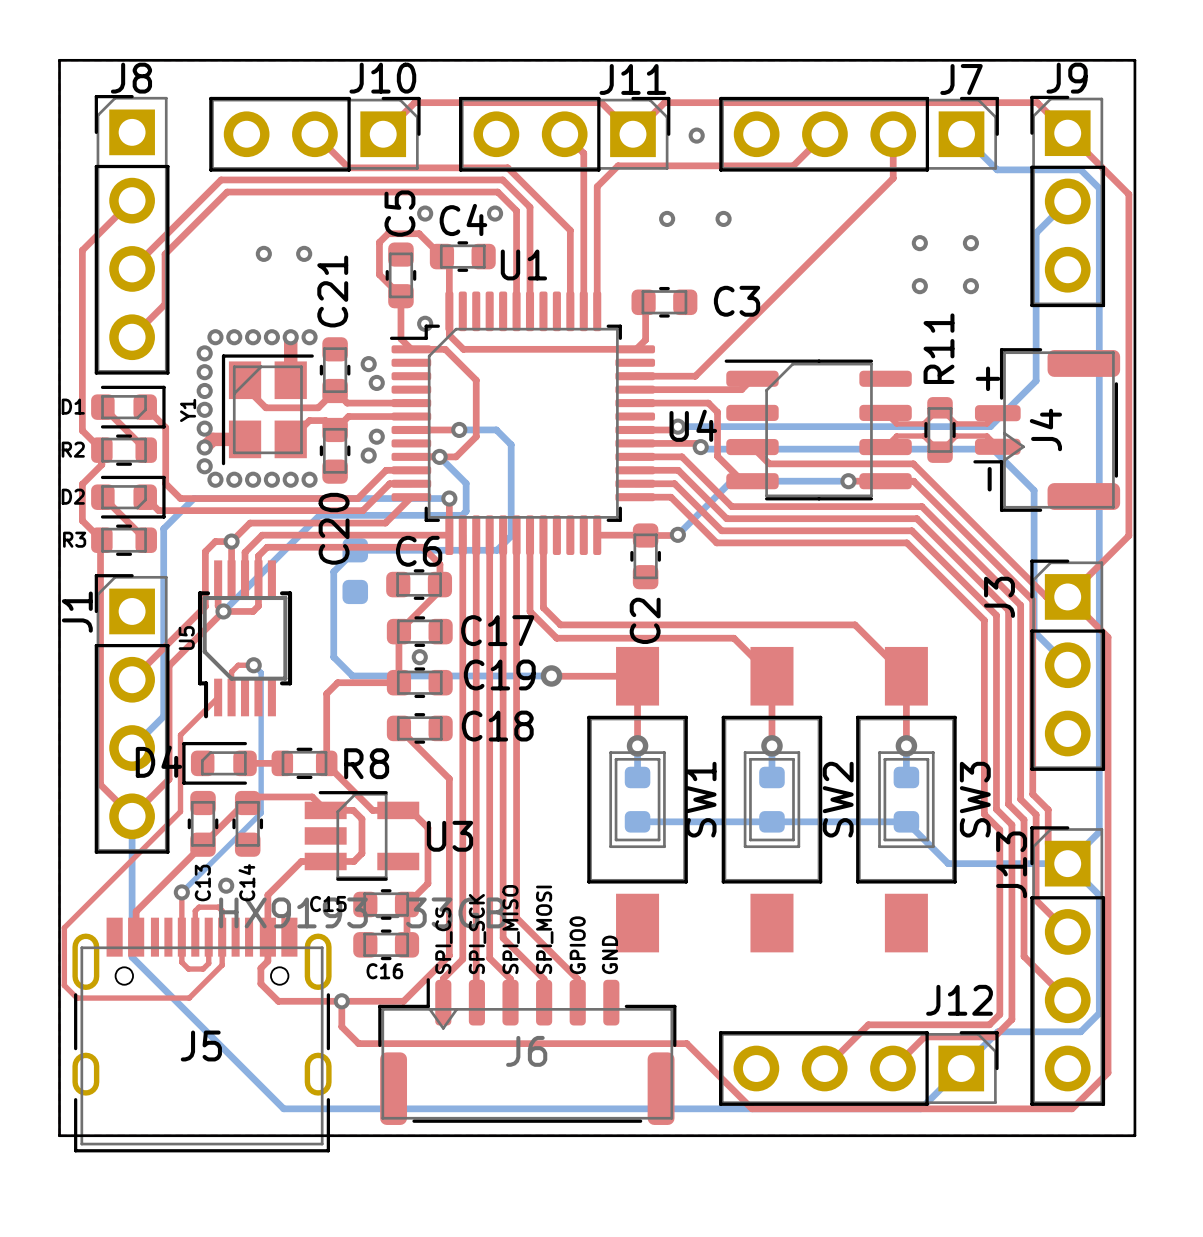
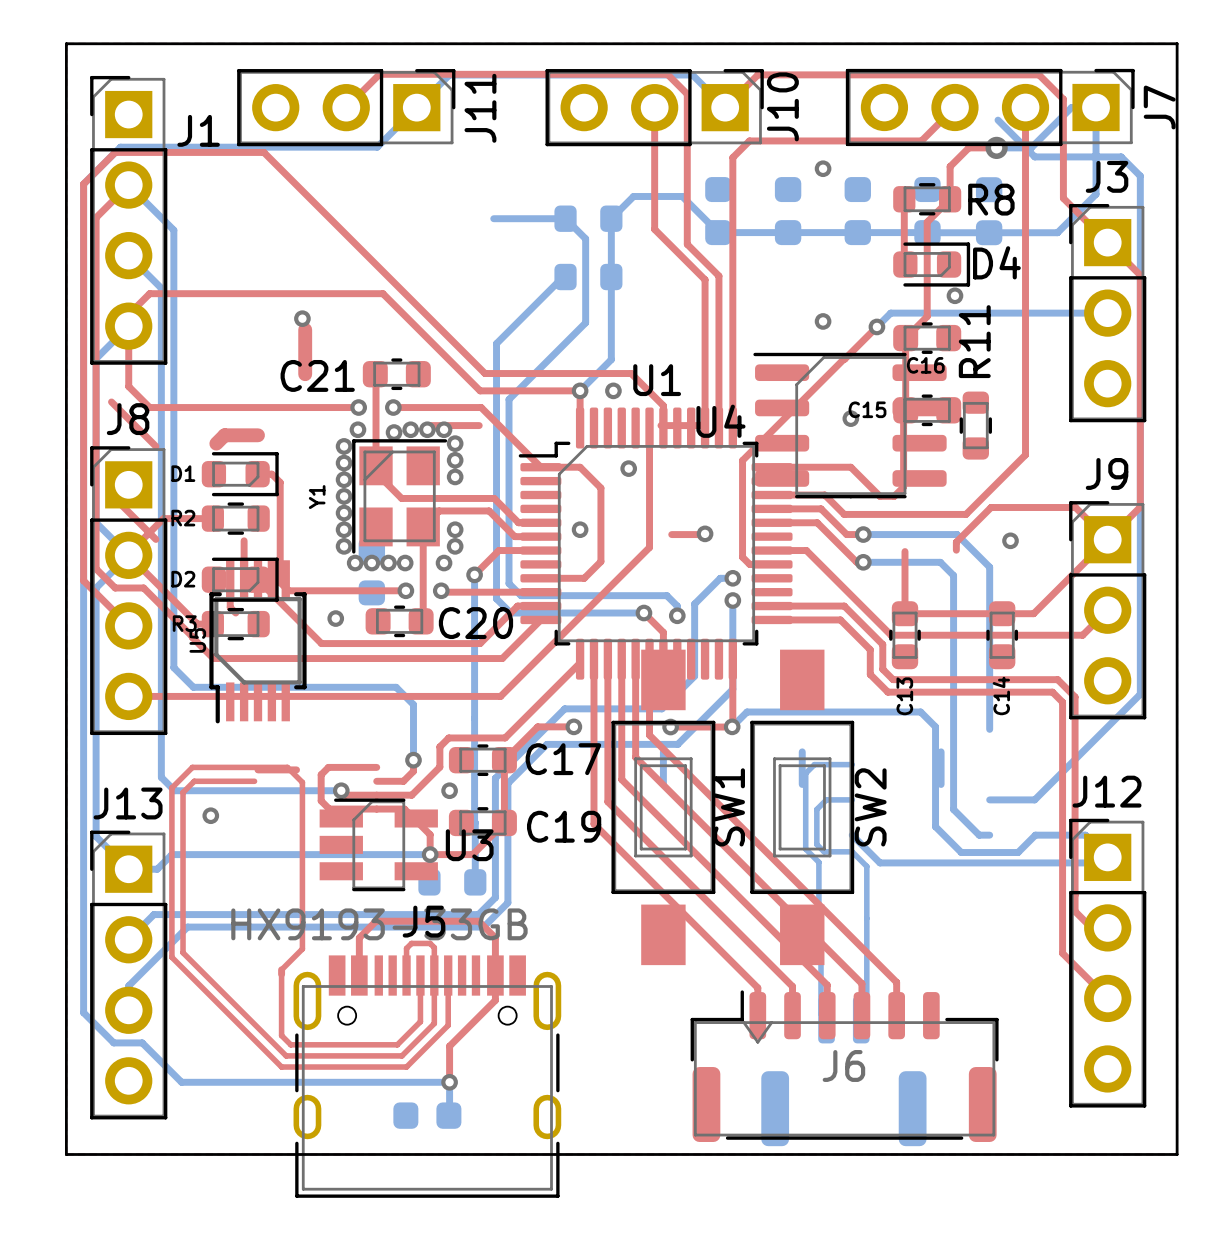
J8 name position: J8 (131, 78) -> J8 (128, 419)
J10 name rotation: 0° (382, 78) -> 90° counterclockwise (782, 106)
J9 name position: J9 (1067, 78) -> J9 (1107, 473)
J11 name rotation: 0° (632, 79) -> 90° counterclockwise (480, 108)
J7 name rotation: 0° (961, 79) -> 90° counterclockwise (1159, 107)
J7 name position: J7 (961, 79) -> J7 (1159, 107)
top track: none -> (346, 107) (379, 74) (667, 74) (687, 94) (687, 244) (718, 276) (718, 428)
top track: none -> (654, 107) (654, 229) (705, 279) (705, 428)
top track: none -> (725, 107) (757, 74) (1039, 74) (1063, 99) (1063, 198) (1140, 275) (1140, 507) (1033, 613) (904, 613) (904, 551)
bottom track: none -> (725, 107) (692, 75) (449, 75) (377, 147) (120, 147) (83, 184) (83, 1012) (113, 1042) (142, 1042) (181, 1082) (449, 1082) (448, 1115)
top track: none -> (954, 107) (921, 140) (749, 140) (732, 157) (732, 428)
top track: none -> (1025, 107) (1025, 454) (965, 514) (844, 514) (824, 495) (772, 495)
top track: (314, 134) (348, 167) (507, 167) (570, 230) (570, 311) -> none
J10 position: (314, 134) -> (654, 107)
top track: (383, 134) (414, 102) (601, 102) (632, 134) (664, 102) (1037, 102) (1128, 194) (1128, 535) (1067, 596) -> none
top track: (564, 134) (583, 153) (583, 311) -> none
J11 position: (564, 134) -> (346, 107)
top track: (824, 134) (793, 165) (618, 165) (597, 186) (597, 311) -> none
J7 position: (859, 134) -> (990, 107)
top track: (893, 134) (893, 178) (695, 376) (635, 376) -> none
via: (696, 135) -> none
top track: none -> (996, 147) (968, 147) (950, 166) (950, 199) (927, 222) (927, 316) (905, 338) (903, 487) (894, 496) (880, 496) (850, 467) (772, 467)
bottom track: none -> (996, 147) (1031, 147) (1071, 107) (1096, 107) (1096, 194) (1057, 232) (927, 232)
via: none -> (996, 147)
via: none -> (823, 168)
top track: none -> (128, 185) (96, 217) (96, 568) (115, 587) (143, 587) (213, 658) (502, 658) (540, 619)
bottom track: none -> (128, 185) (173, 230) (173, 667) (193, 687) (396, 687) (413, 704) (413, 760)
top track: (132, 200) (82, 250) (82, 430) (101, 450) (101, 464) (82, 484) (82, 520) (101, 540) (100, 784) (132, 816) (169, 779) (169, 665) (223, 611) (253, 611) (258, 606) (258, 555) (267, 547) (422, 547) (439, 564) (439, 590) (398, 631) (398, 682) (337, 682) (326, 693) (326, 764) (372, 810) (410, 810) (427, 827) (427, 883) (407, 904) (407, 944) -> none
bottom track: (1067, 201) (1036, 233) (1036, 380) (990, 426) (677, 426) -> none
J9 position: (1067, 201) -> (1107, 610)
top track: none -> (904, 199) (905, 264)
via: (425, 213) -> none
via: (495, 213) -> none
via: (667, 218) -> none
via: (723, 218) -> none
bottom track: none -> (493, 218) (565, 218) (585, 238) (585, 322) (509, 399) (509, 583) (521, 595) (666, 595) (677, 606) (677, 615)
part: none -> (588, 218)
J8 position: (132, 234) -> (128, 590)
bottom track: none -> (927, 232) (718, 232) (682, 196) (633, 196) (611, 218) (611, 359) (580, 390)
via: (919, 243) -> none
via: (970, 243) -> none
via: (263, 253) -> none
via: (304, 253) -> none
C4 side: top (462, 256) -> bottom (857, 211)
bottom track: none -> (128, 255) (161, 288) (161, 777) (174, 790) (341, 790)
top track: (132, 268) (221, 179) (502, 179) (530, 207) (530, 311) -> none
C5 side: top (400, 275) -> bottom (927, 211)
bottom track: none -> (565, 277) (563, 277) (496, 343) (496, 598) (510, 613) (643, 613)
part: none -> (588, 277)
via position: (919, 286) -> (954, 295)
via: (970, 286) -> none
C21 name position: C21 (332, 291) -> C21 (317, 375)
top track: (643, 302) (645, 304) (645, 339) (636, 349) (463, 349) (449, 335) (449, 263) (419, 233) (388, 233) (379, 242) (379, 274) (400, 296) (400, 338) (411, 349) (445, 349) (476, 380) (476, 436) (456, 456) (411, 456) -> none
C3 side: top (664, 302) -> bottom (788, 211)
top track: (516, 311) (516, 210) (497, 192) (227, 192) (165, 254) (165, 304) (132, 337) -> none
bottom track: none -> (1107, 313) (890, 313) (876, 326)
via: (425, 323) -> none
via: none -> (302, 318)
via: none -> (823, 321)
bottom track: none -> (128, 326) (96, 358) (96, 522) (128, 555) (96, 587) (96, 836) (128, 869) (157, 869) (171, 854) (430, 854) (429, 882)
top track: none -> (876, 326) (742, 460) (742, 557) (749, 564) (772, 564)
via: none -> (876, 326)
via: (215, 337) -> none
via: (234, 337) -> none
via: (253, 337) -> none
via: (271, 337) -> none
via: (290, 337) -> none
via: (309, 337) -> none
via: (204, 353) -> none
via: (368, 364) -> none
C21 rotation: 0° (335, 370) -> 90° clockwise (396, 374)
C21 position: (335, 370) -> (396, 374)
via: (204, 372) -> none
top track: (752, 378) (741, 389) (635, 389) -> none
text: + (988, 378) -> none
top track: (245, 380) (245, 386) (265, 407) (318, 407) (335, 391) (347, 403) (411, 403) -> none
top track: none -> (375, 374) (376, 472) (401, 498) (494, 498) (518, 522) (540, 522)
via: (376, 382) -> none
via: (204, 391) -> none
via: none -> (580, 390)
via: none -> (613, 390)
top track: (635, 403) (708, 403) (717, 412) (717, 456) (742, 481) (752, 481) -> none
D1 position: (128, 407) -> (240, 474)
top track: (145, 407) (165, 427) (165, 483) (180, 498) (357, 498) (386, 470) (411, 470) -> none
via: (204, 409) -> none
Y1 position: (267, 409) -> (399, 496)
top track: none -> (358, 407) (149, 407) (128, 386) (128, 314) (149, 293) (382, 293) (480, 390) (580, 390) (580, 428)
via: none -> (358, 407)
top track: none -> (393, 407) (481, 407) (540, 467) (580, 467) (600, 488) (600, 561) (584, 578) (540, 578)
via: none -> (393, 407)
top track: (885, 412) (896, 423) (923, 423) (940, 407) (956, 423) (987, 423) (997, 413) -> none
top track: (411, 416) (348, 416) (335, 429) (325, 420) (309, 420) (290, 439) -> none
U1 position: (522, 423) -> (655, 543)
via: none -> (850, 418)
via: (677, 426) -> none
via: (204, 428) -> none
bottom track: (459, 429) (496, 429) (511, 444) (511, 536) (497, 550) (355, 550) (333, 571) (333, 657) (352, 675) (551, 675) -> none
via: (459, 429) -> none
J4 side: top (1046, 429) -> bottom (843, 1071)
top track: none -> (649, 428) (649, 547) (500, 696) (128, 696)
top track: none -> (663, 428) (663, 405) (631, 373) (485, 373) (263, 152) (115, 152) (83, 184) (83, 580) (128, 625)
via: none -> (357, 429)
via: none -> (410, 429)
via: none -> (427, 429)
via: none -> (444, 429)
top track: (635, 443) (697, 443) (700, 447) -> none
top track: (997, 446) (987, 436) (956, 436) (940, 452) (923, 436) (896, 436) (885, 447) -> none
via: (204, 447) -> none
via: none -> (455, 443)
bottom track: (700, 447) (702, 449) (992, 449) (1034, 490) (1034, 631) (1067, 665) -> none
via: (700, 447) -> none
top track: (752, 447) (769, 463) (913, 463) (1046, 596) (1067, 596) -> none
R2 position: (124, 450) -> (235, 518)
via: none -> (344, 446)
C20 rotation: 0° (335, 450) -> 90° clockwise (399, 621)
C20 position: (335, 450) -> (399, 621)
via: (368, 455) -> none
bottom track: (439, 456) (466, 483) (466, 511) (462, 515) (319, 515) (223, 611) -> none
via: (439, 456) -> none
top track: (635, 456) (681, 456) (731, 506) (921, 506) (1020, 605) (1020, 799) (1036, 814) -> (772, 606) (844, 606) (882, 644) (882, 669) (893, 679) (1057, 679) (1075, 697) (1075, 823)
via: none -> (455, 460)
via: (204, 466) -> none
via: none -> (344, 463)
top track: (635, 470) (678, 470) (726, 518) (916, 518) (1008, 610) (1008, 804) (1024, 819) -> (772, 619) (840, 619) (870, 649) (870, 674) (887, 692) (1052, 692) (1062, 702) (1062, 828)
via: none -> (628, 468)
top track: none -> (257, 474) (271, 474) (280, 482) (280, 582) (288, 590) (405, 590)
via: (215, 479) -> none
via: (234, 479) -> none
via: (253, 479) -> none
via: (271, 479) -> none
via: (290, 479) -> none
via: (309, 479) -> none
via: none -> (455, 476)
text: - (989, 479) -> none
top track: (848, 481) (913, 481) (1032, 600) (1032, 794) (1048, 809) (1048, 844) (1067, 863) -> none
bottom track: (848, 481) (731, 481) (677, 534) -> none
via: (848, 481) -> none
via: none -> (344, 479)
top track: (411, 483) (389, 483) (362, 510) (158, 510) (145, 497) -> none
top track: (635, 483) (674, 483) (721, 530) (911, 530) (996, 615) (996, 809) (1011, 824) (1011, 1019) (994, 1036) (924, 1036) (892, 1068) -> none
D2 position: (128, 497) -> (240, 579)
top track: (411, 497) (385, 523) (250, 523) (231, 541) (215, 541) (205, 551) (205, 606) (132, 679) -> none
top track: (635, 497) (670, 497) (716, 542) (906, 542) (984, 620) (984, 814) (999, 829) (999, 1014) (989, 1024) (868, 1024) (824, 1068) -> none
via: none -> (344, 496)
top track: (449, 498) (449, 535) (262, 535) (245, 552) (245, 579) -> (540, 606) (517, 606) (480, 643) (321, 643) (257, 579)
bottom track: (449, 498) (193, 498) (163, 528) (163, 716) (132, 748) -> none
via: (449, 498) -> none
top track: none -> (772, 508) (821, 508) (846, 534) (863, 534)
via: none -> (344, 513)
top track: none -> (212, 518) (163, 518) (128, 553) (197, 624) (212, 624)
top track: none -> (772, 522) (817, 522) (856, 562) (863, 562)
C20 name position: C20 (334, 528) -> C20 (475, 623)
via: none -> (344, 529)
via: none -> (455, 529)
via: none -> (580, 529)
top track: (462, 535) (462, 959) (443, 978) (443, 1002) -> none
top track: (476, 535) (476, 1002) -> none
top track: (489, 535) (489, 958) (510, 979) (510, 1002) -> none
top track: (503, 535) (503, 938) (544, 979) (544, 1002) -> none
top track: (516, 535) (516, 917) (577, 979) (577, 1002) -> none
top track: (530, 535) (530, 611) (556, 638) (733, 638) (771, 676) (771, 745) -> none
top track: (543, 535) (543, 607) (560, 624) (855, 624) (906, 676) (906, 745) -> none
top track: (597, 535) (645, 535) -> none
bottom track: none -> (863, 534) (957, 534) (989, 567) (989, 729)
via: none -> (863, 534)
top track: none -> (540, 536) (514, 536) (489, 510) (439, 510) (423, 526) (423, 613) (421, 615)
R3 position: (124, 540) -> (235, 624)
top track: none -> (1107, 539) (1075, 507) (991, 507) (956, 542) (956, 550)
via: (231, 541) -> none
via: none -> (1010, 540)
via: none -> (344, 546)
via: none -> (455, 546)
top track: none -> (540, 550) (498, 550) (474, 574)
top track: none -> (772, 550) (806, 550) (891, 635) (1082, 635) (1107, 610)
C2 side: top (645, 556) -> bottom (718, 211)
bottom track: none -> (863, 562) (940, 562) (953, 575) (953, 809) (979, 835) (989, 835)
via: none -> (863, 562)
via: none -> (355, 563)
via: none -> (371, 563)
via: none -> (388, 563)
via: none -> (405, 563)
via: none -> (444, 563)
bottom track: none -> (474, 574) (475, 882)
via: none -> (474, 574)
bottom track: none -> (732, 578) (720, 578) (694, 603) (694, 676) (661, 708) (564, 708) (495, 778) (495, 897) (478, 914) (153, 914) (128, 939)
via: none -> (732, 578)
C6 side: top (419, 584) -> bottom (989, 211)
via: none -> (405, 590)
top track: none -> (441, 590) (540, 592)
via: none -> (441, 590)
top track: (1067, 596) (1108, 637) (1108, 1072) (1072, 1108) (752, 1108) (686, 1043) (358, 1043) (341, 1026) (341, 1001) -> none
J3 name rotation: 0° (999, 597) -> 90° clockwise (1107, 176)
J3 name position: J3 (999, 597) -> J3 (1107, 176)
bottom track: none -> (732, 600) (732, 689) (677, 744) (546, 744) (507, 783) (507, 902) (483, 927) (187, 927) (128, 985) (128, 1010)
via: none -> (732, 600)
via: (223, 611) -> none
top track: none -> (643, 613) (663, 632) (663, 659)
via: none -> (643, 613)
J1 name rotation: 0° (77, 612) -> 90° clockwise (198, 130)
J1 name position: J1 (77, 612) -> J1 (198, 130)
via: none -> (677, 615)
via: none -> (335, 618)
C17 position: (419, 631) -> (482, 760)
top track: none -> (580, 659) (580, 662) (505, 737) (448, 737) (439, 746) (439, 767) (411, 795) (345, 795) (341, 790)
top track: none -> (593, 659) (593, 824) (757, 987) (757, 1015)
top track: none -> (607, 659) (607, 801) (792, 986) (792, 1015)
top track: none -> (621, 659) (621, 779) (827, 985) (827, 1015)
top track: none -> (635, 659) (635, 757) (861, 983) (861, 1015)
top track: none -> (649, 659) (649, 735) (896, 982) (896, 1015)
top track: none -> (732, 659) (732, 726) (670, 727)
via: (419, 657) -> none
top track: (253, 665) (238, 665) (231, 671) (231, 697) -> none
bottom track: (253, 665) (261, 672) (261, 813) (181, 892) -> none
via: (253, 665) -> none
J3 position: (1067, 665) -> (1107, 313)
C19 name position: C19 (499, 674) -> C19 (564, 826)
via: (551, 675) -> none
top track: (551, 676) (637, 676) (637, 745) -> none
C19 position: (419, 682) -> (482, 822)
bottom track: (1099, 690) (1099, 832) (1067, 863) -> (1140, 694) (1034, 799) (989, 799)
top track: (218, 697) (180, 735) (180, 811) (64, 927) (64, 985) (76, 998) (189, 998) (222, 965) (222, 910) (218, 907) (199, 907) (195, 910) (195, 937) -> none
J1 position: (132, 713) -> (128, 220)
top track: none -> (573, 726) (537, 726) (504, 760) (504, 822) (472, 854) (430, 854) (430, 834) (404, 809) (329, 809) (321, 800) (321, 774) (328, 767) (376, 767)
via: none -> (573, 726)
via: none -> (670, 727)
bottom track: none -> (732, 726) (747, 712) (920, 712) (935, 726) (935, 826) (961, 852) (1018, 852) (1035, 835) (1085, 835) (1107, 857) (1102, 862) (880, 862) (852, 835)
via: none -> (732, 726)
top track: (398, 728) (449, 778) (449, 955) (403, 1001) (278, 1001) (260, 983) (260, 968) (267, 961) -> (420, 975) (420, 1021) (397, 1044) (290, 1044) (281, 1035) (281, 974)
C18 side: top (419, 728) -> bottom (427, 1115)
via: (637, 745) -> none
via: (771, 745) -> none
via: (906, 745) -> none
top track: none -> (413, 760) (413, 771) (403, 781) (376, 781)
via: none -> (413, 760)
bottom track: none -> (852, 764) (814, 764) (805, 773) (805, 849) (818, 862) (820, 1014) (826, 1019)
D4 rotation: 0° (219, 763) -> 180° (931, 264)
D4 position: (219, 763) -> (931, 264)
R8 position: (304, 763) -> (927, 199)
top track: none -> (254, 781) (194, 781) (183, 792) (183, 952) (286, 1055) (401, 1055) (434, 1023) (434, 947) (430, 943) (411, 943) (406, 948) (406, 975)
via: none -> (341, 790)
via: none -> (449, 790)
bottom track: none -> (852, 799) (826, 799) (816, 809) (816, 844) (824, 851) (852, 851) (866, 866) (866, 1014) (861, 1019)
part: (637, 799) -> none
part: (771, 799) -> none
SW3: (906, 799) -> none
part: (906, 799) -> none
via: none -> (210, 815)
bottom track: (132, 816) (132, 957) (283, 1108) (920, 1108) (997, 1031) (1080, 1031) (1099, 1013) (1099, 895) (1067, 863) -> none
bottom track: (637, 821) (906, 821) (948, 863) (1067, 863) -> none
C13 position: (203, 823) -> (904, 635)
C14 position: (247, 823) -> (1002, 635)
via: none -> (430, 854)
J13 name rotation: 0° (1011, 864) -> 90° clockwise (128, 803)
part: none -> (452, 882)
via: (226, 885) -> none
top track: (181, 892) (181, 962) (188, 969) (203, 969) (208, 963) (208, 937) -> none
via: (181, 892) -> none
C15 position: (386, 904) -> (927, 410)
text: SPI_MISO (511, 929) -> none
text: SPI_MOSI (544, 929) -> none
text: SPI_SCK (477, 934) -> none
top track: (136, 937) (136, 911) (244, 803) (247, 803) (253, 796) (312, 796) (325, 810) (353, 810) (361, 819) (361, 853) (353, 861) (301, 861) (267, 895) (267, 956) -> (448, 975) (448, 1025) (406, 1067) (281, 1067) (171, 957) (171, 787) (192, 767) (287, 767) (302, 782) (302, 949) (281, 969)
text: SPI_CS (443, 940) -> none
top track: (1024, 940) (1024, 956) (1067, 1000) -> (1062, 953) (1107, 998)
C16 position: (386, 944) -> (927, 338)
text: GPIO0 (577, 945) -> none
text: GND (609, 954) -> none
top track: none -> (359, 975) (359, 937) (376, 921) (478, 921) (495, 937) (495, 1000) (449, 1046) (449, 1082)
J13 position: (1067, 966) -> (128, 975)
J12 name position: J12 (959, 1000) -> J12 (1107, 791)
via: (341, 1001) -> none
J5 position: (202, 1035) -> (427, 1076)
J5 name position: J5 (201, 1045) -> J5 (423, 921)
J6 position: (527, 1051) -> (844, 1066)
via: none -> (449, 1082)
J12 rotation: 0° (858, 1068) -> 90° counterclockwise (1107, 963)
J12 position: (858, 1068) -> (1107, 963)

